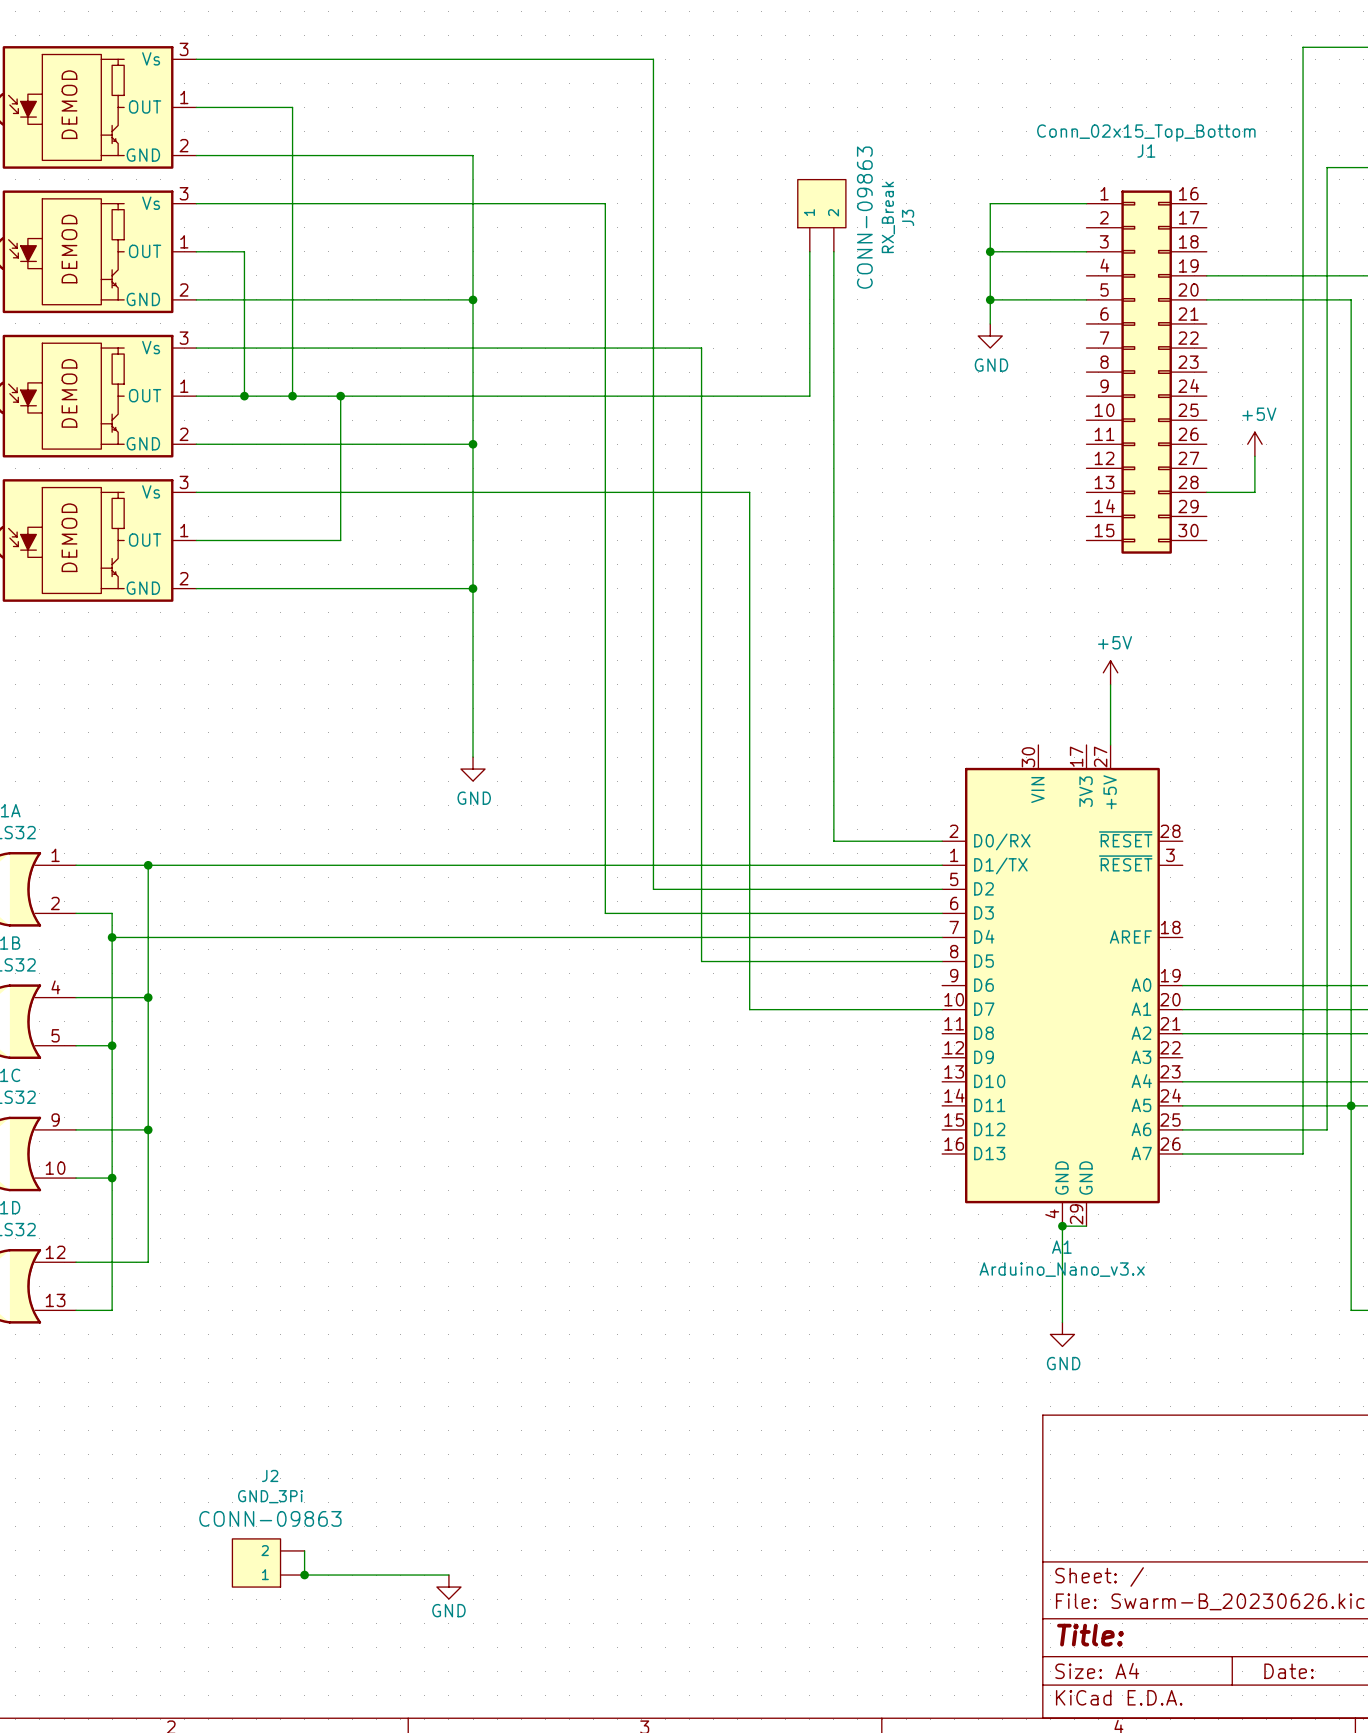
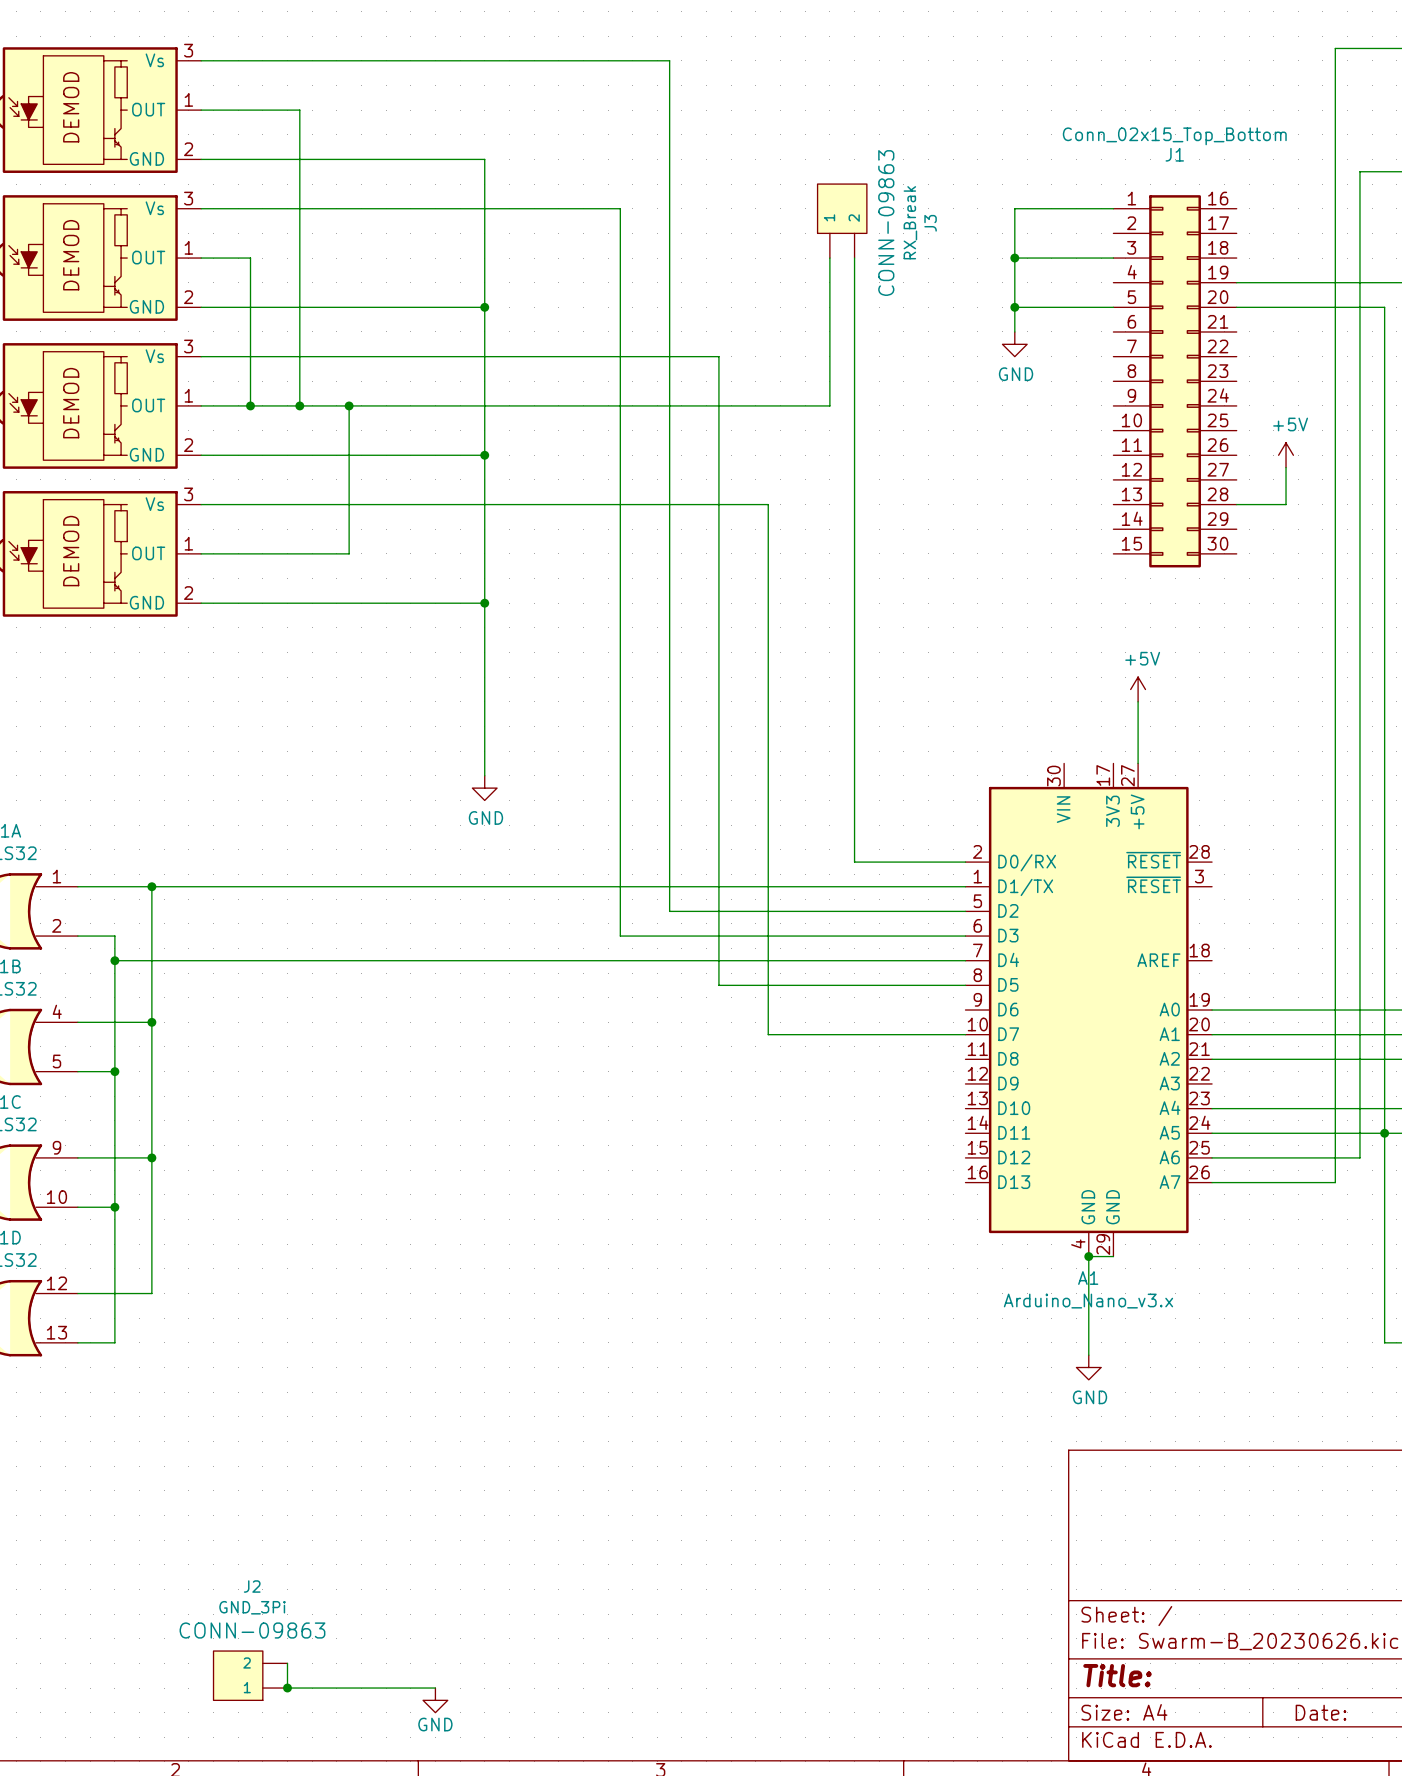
wire: (304, 1550) (304, 1575) (448, 1575) -> (287, 1663) (287, 1688) (435, 1688)
J2 position: (268, 1562) -> (250, 1675)
junction: (304, 1575) -> none
power symbol position: GND (448, 1587) -> GND (435, 1700)
junction: none -> (287, 1688)

